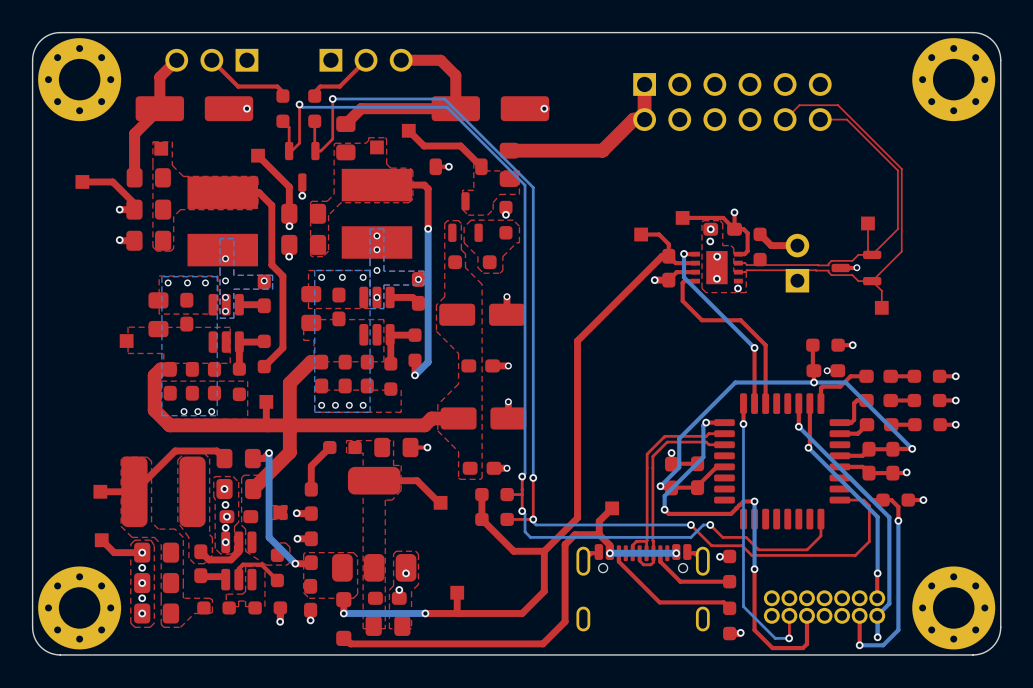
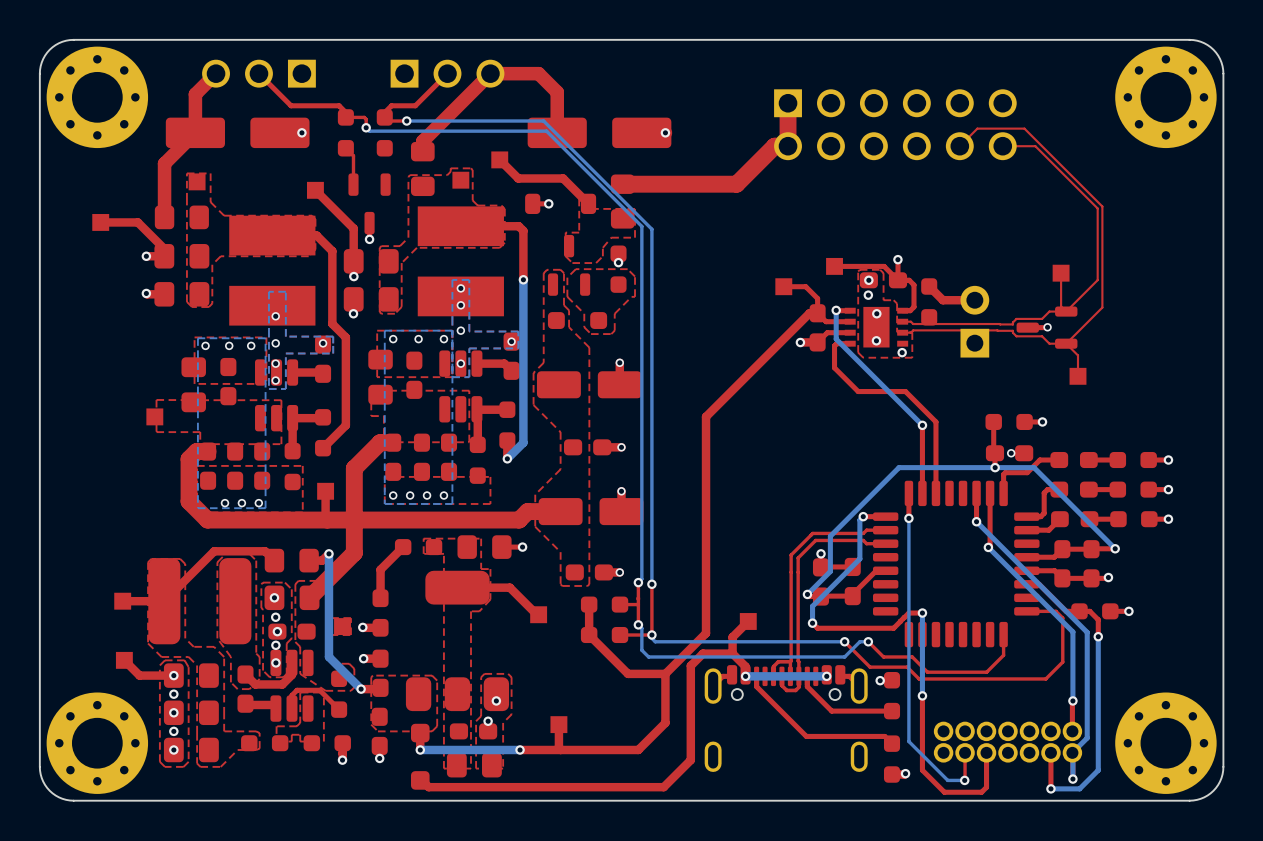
top track: (332, 98) (332, 139) (320, 151) (314, 150) (314, 121) -> (406, 121) (388, 121) (384, 117)
top track: (299, 104) (299, 143) (291, 151) (289, 151) -> (366, 127) (366, 119) (364, 117) (345, 117)
top track: (455, 108) (361, 108) (345, 124) -> (490, 73) (422, 141) (422, 151)

